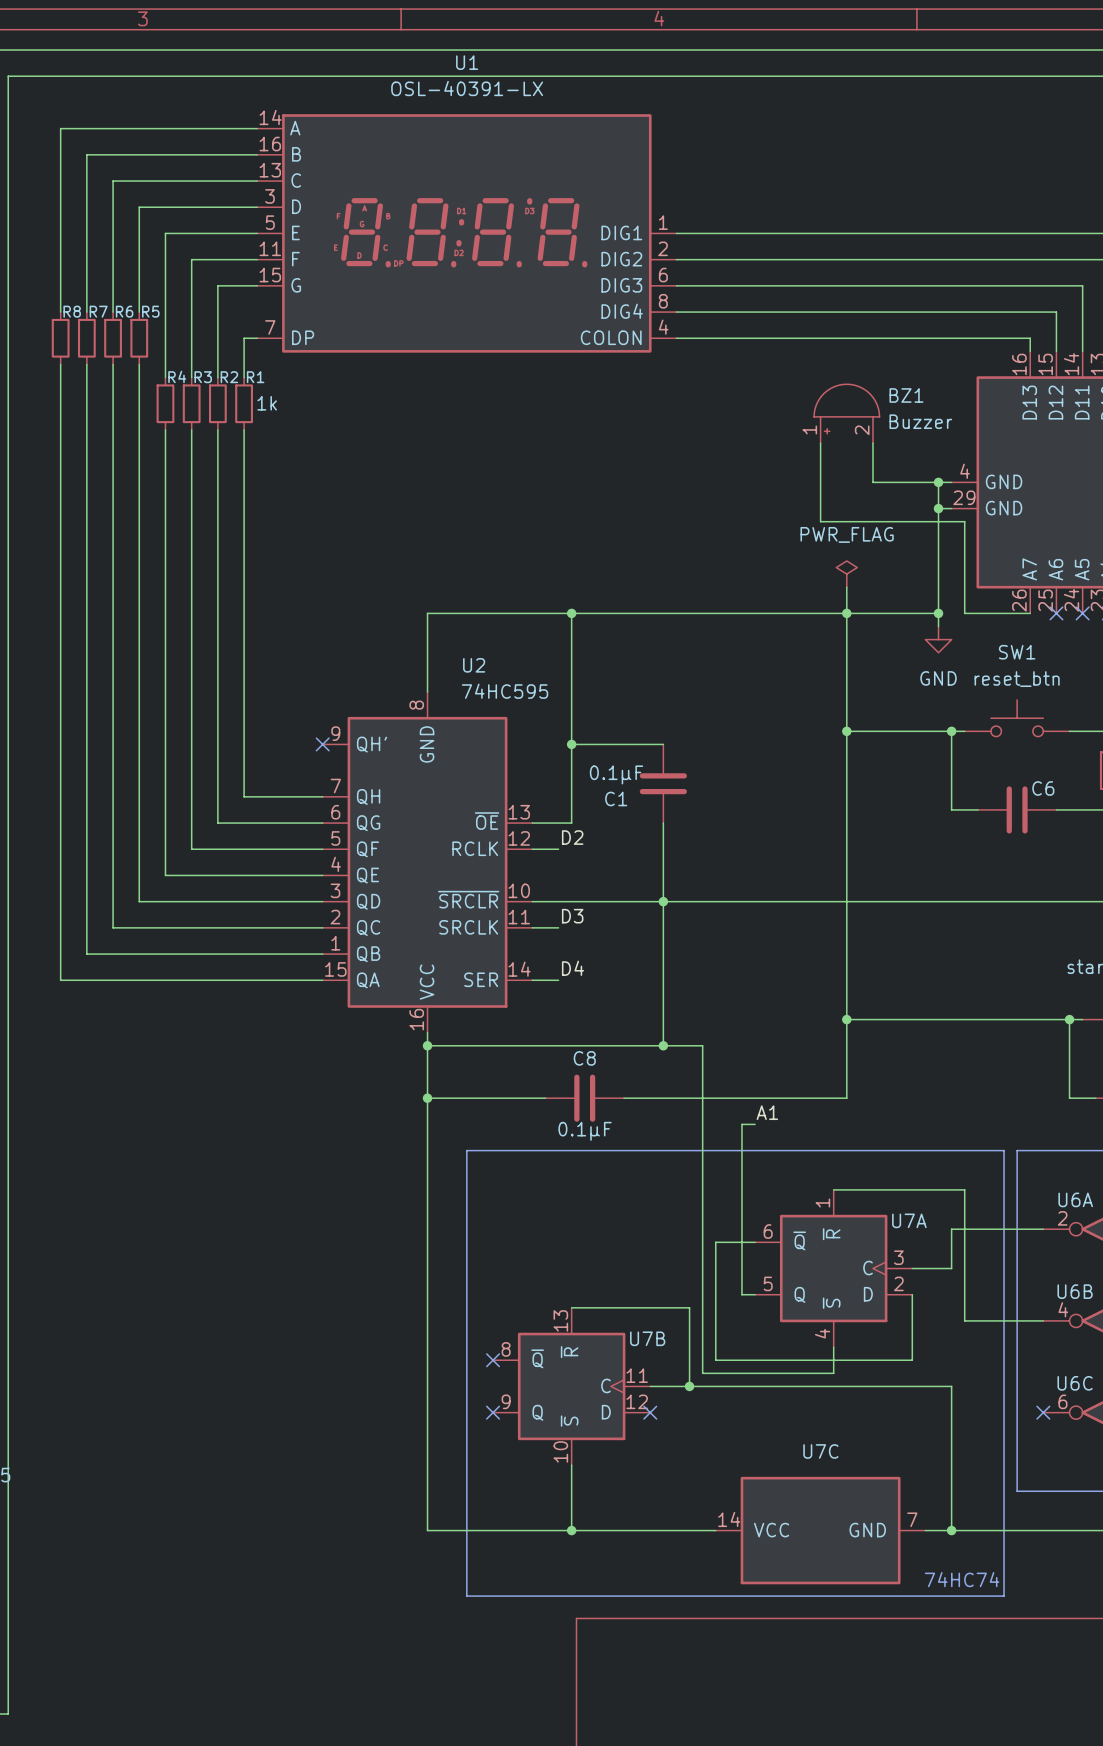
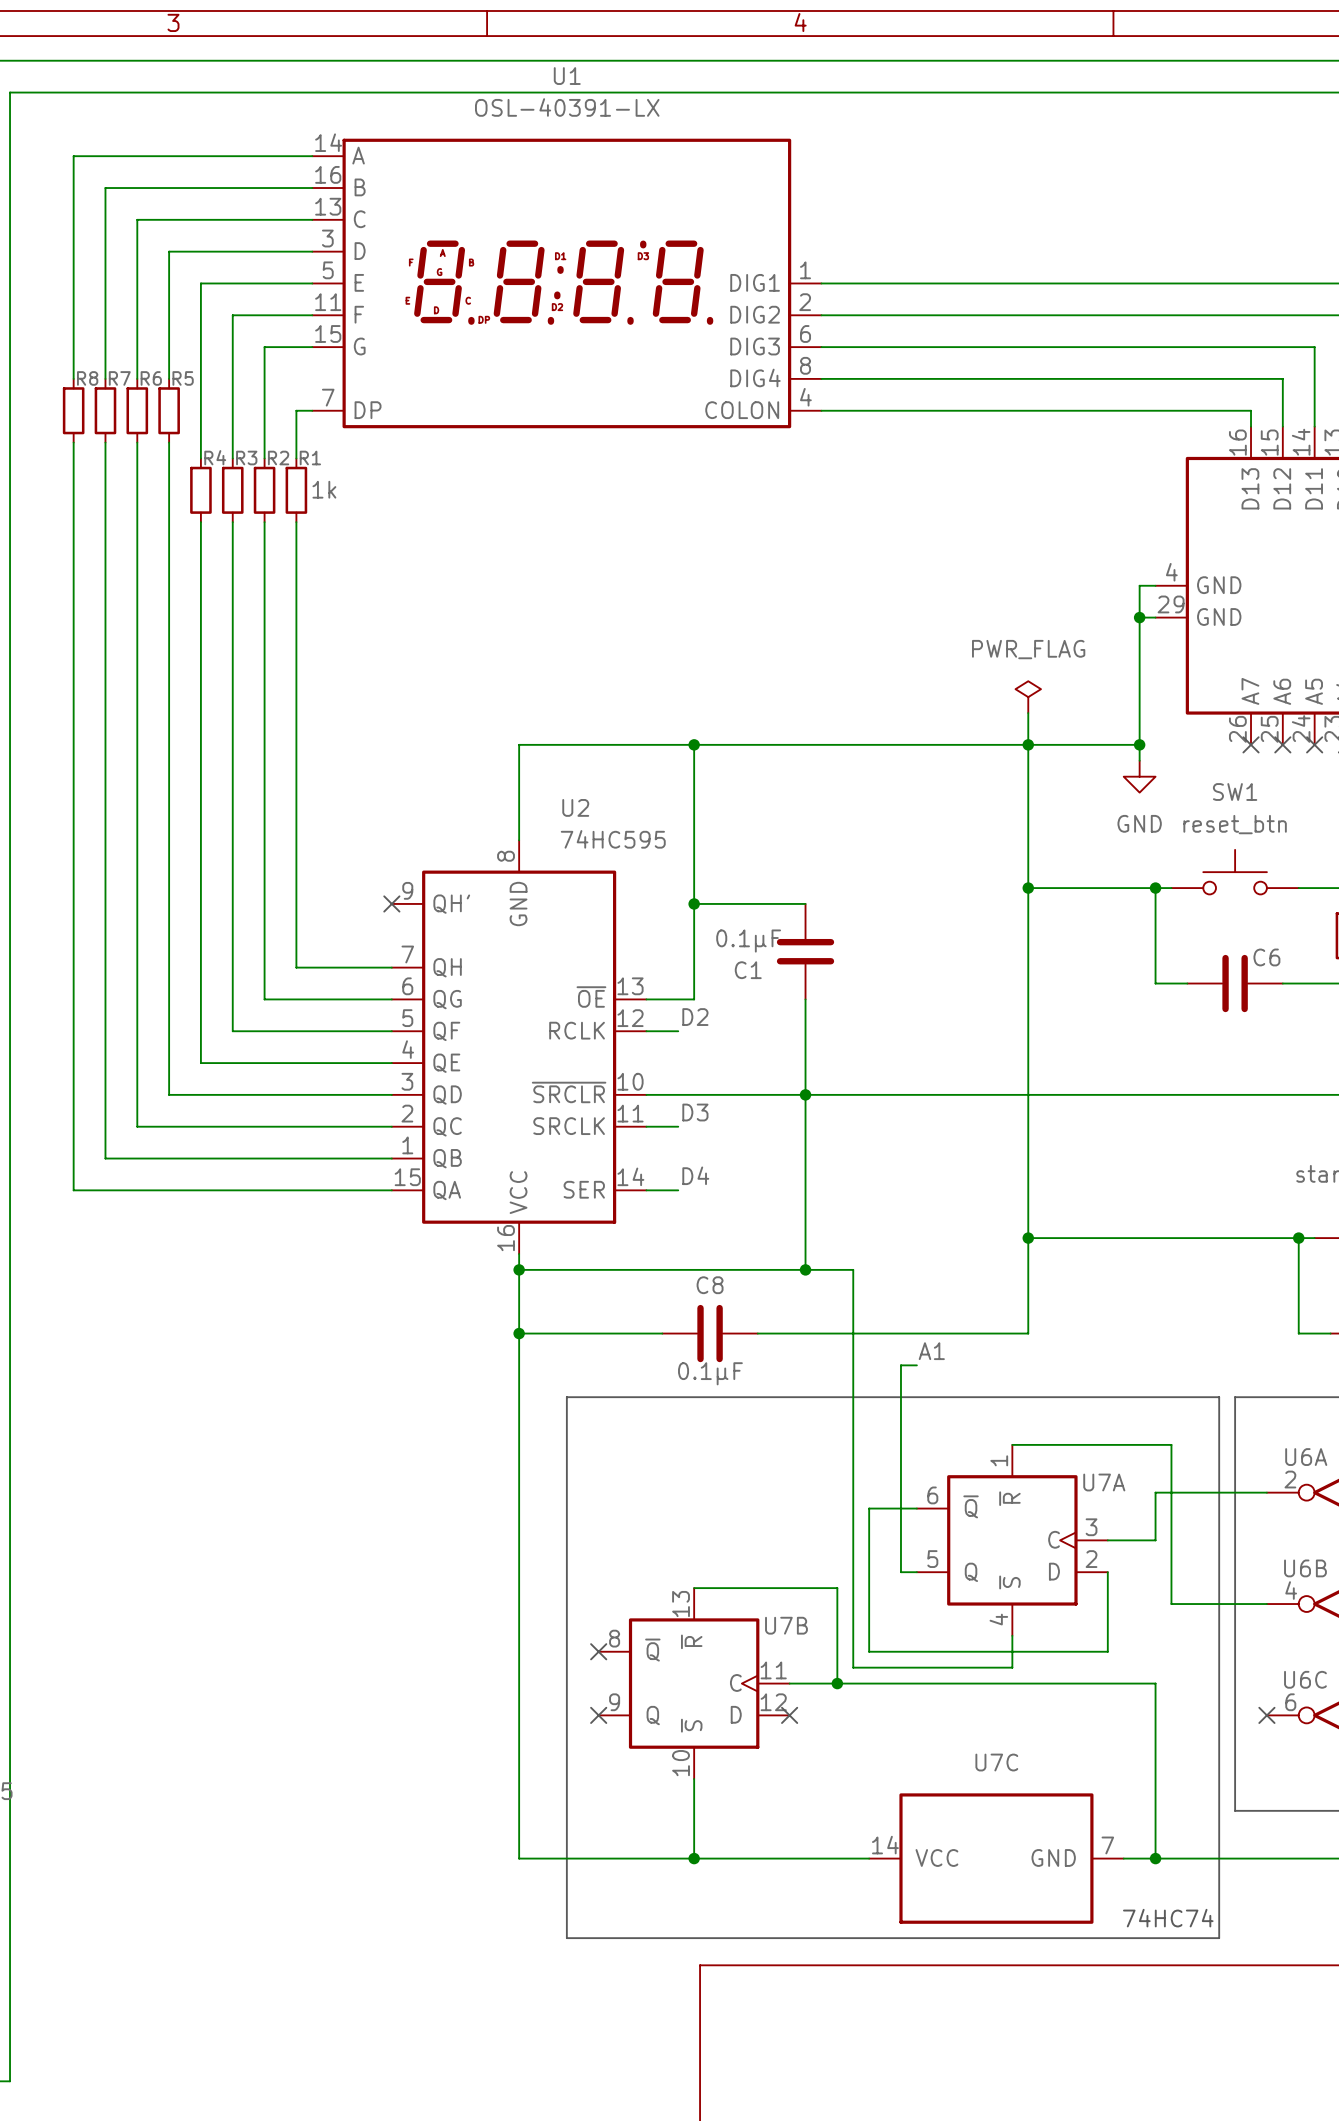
BZ1: Buzzer (846, 413) -> none
wire: (820, 443) (820, 521) (964, 521) (964, 613) (1030, 613) -> none
wire: (873, 443) (873, 482) (938, 482) -> none
junction: (938, 482) -> none
no-connect mark: none -> (1251, 744)

